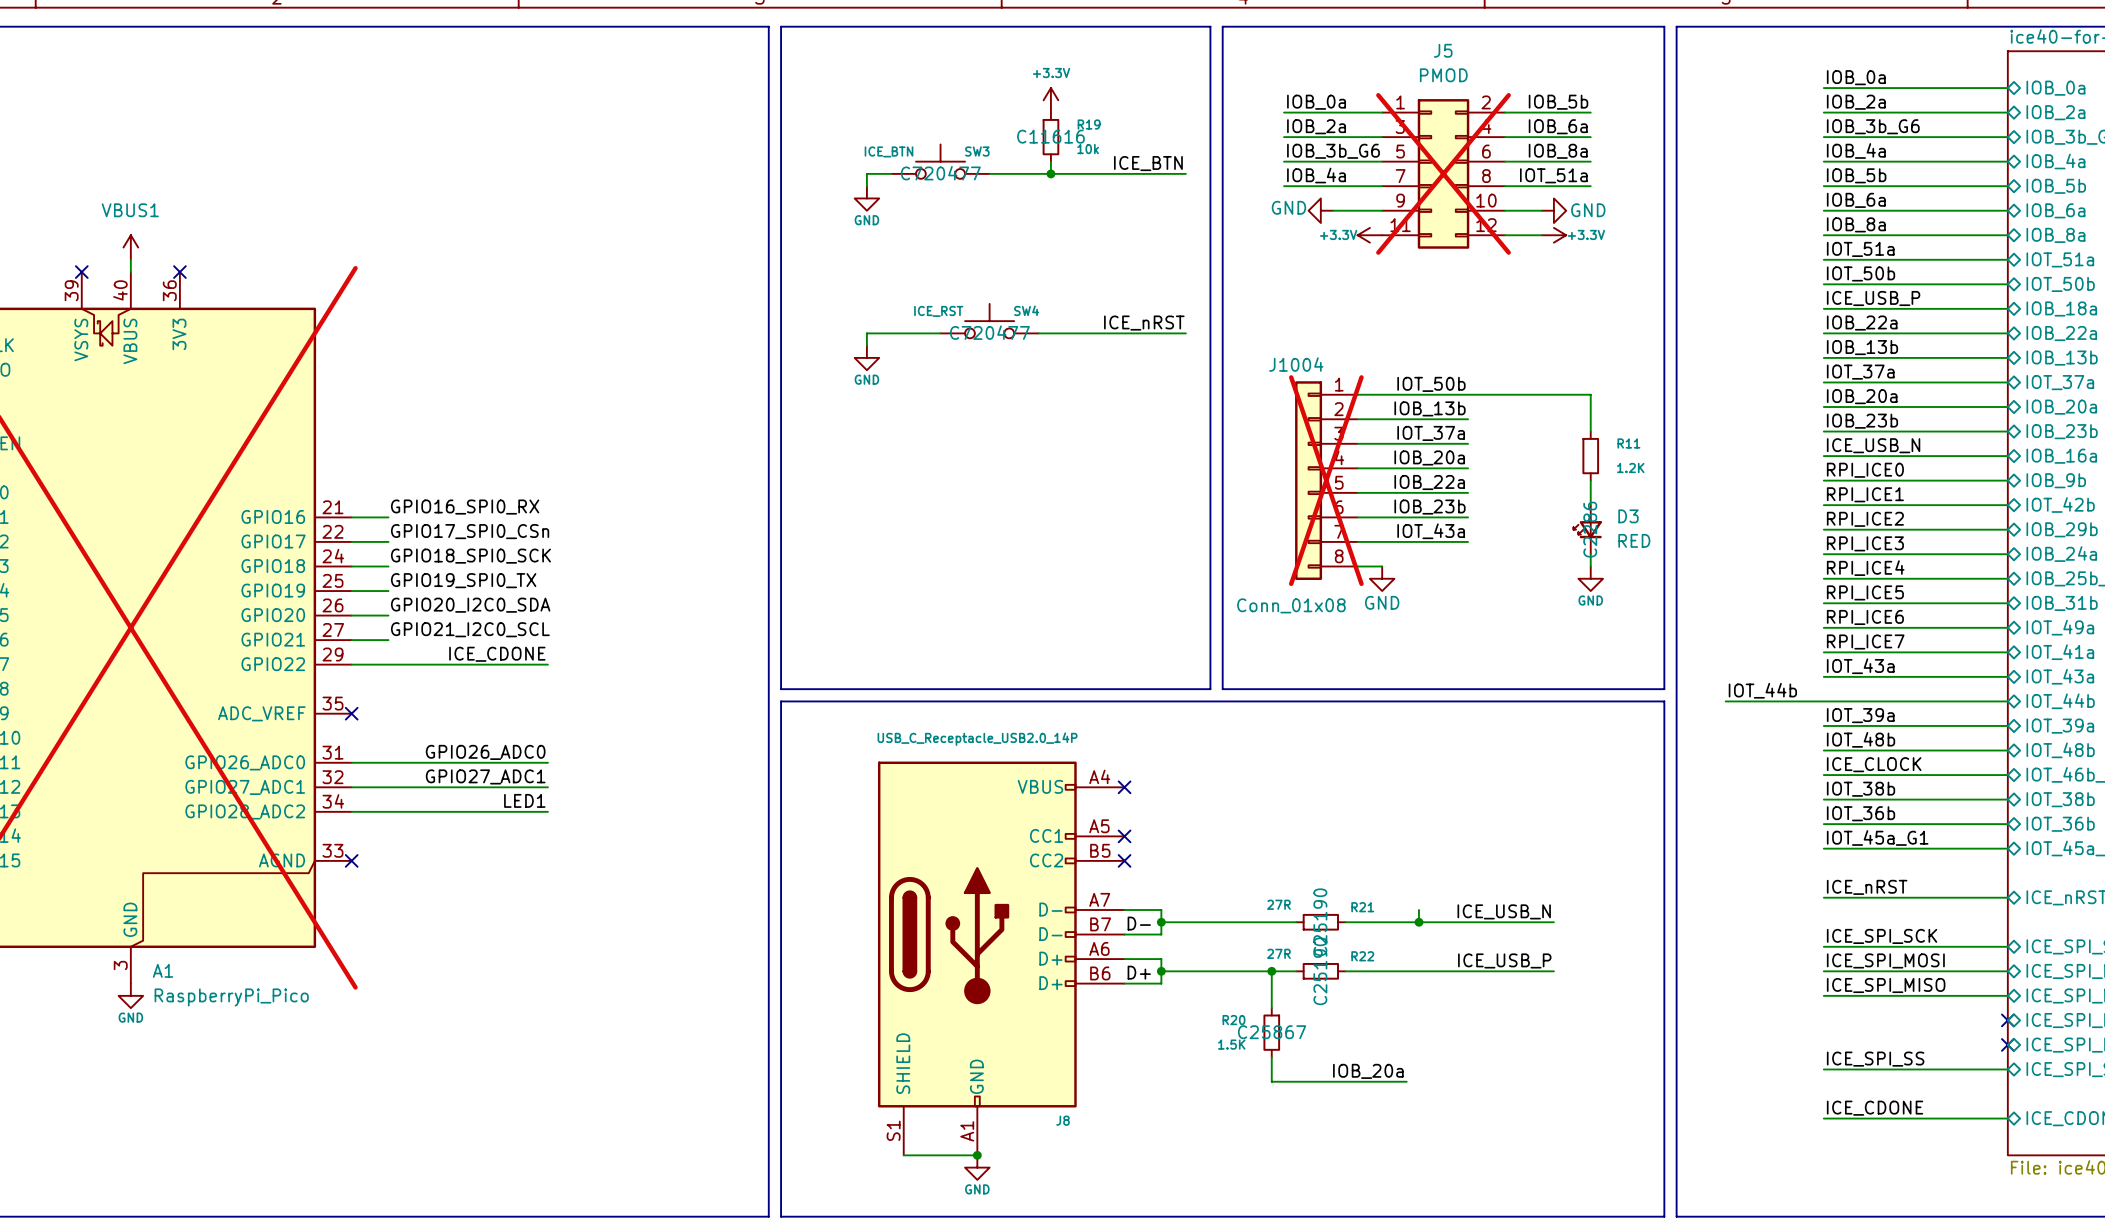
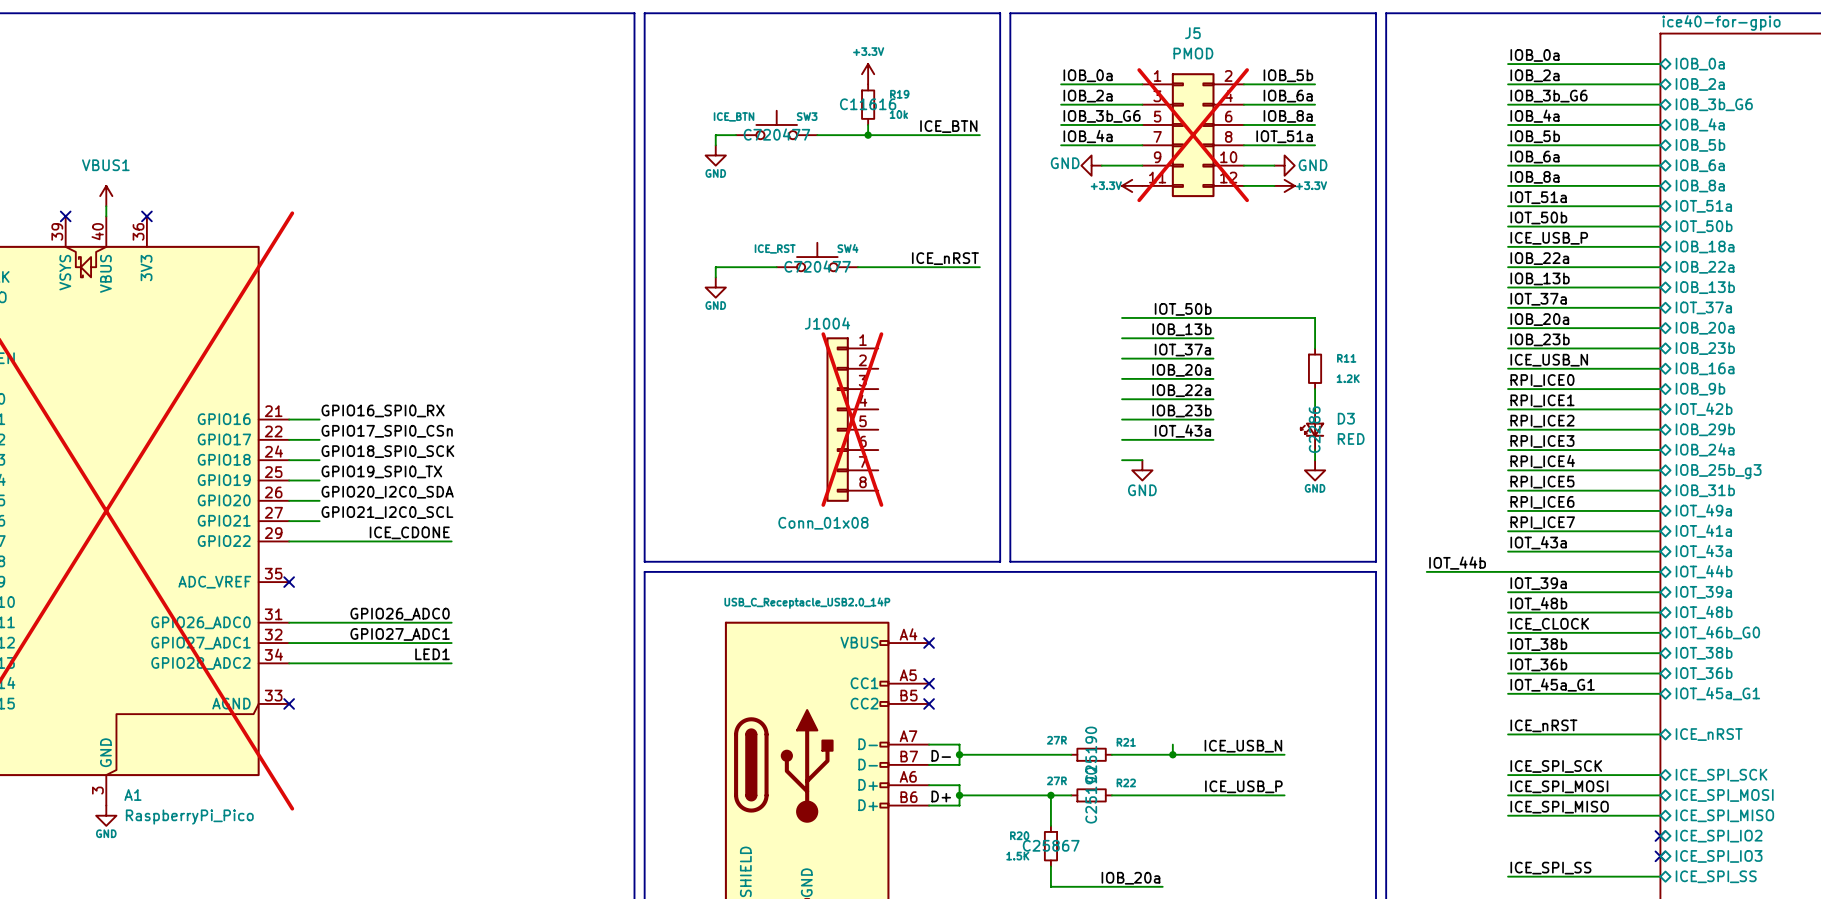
J1004 position: (1326, 480) -> (852, 419)

